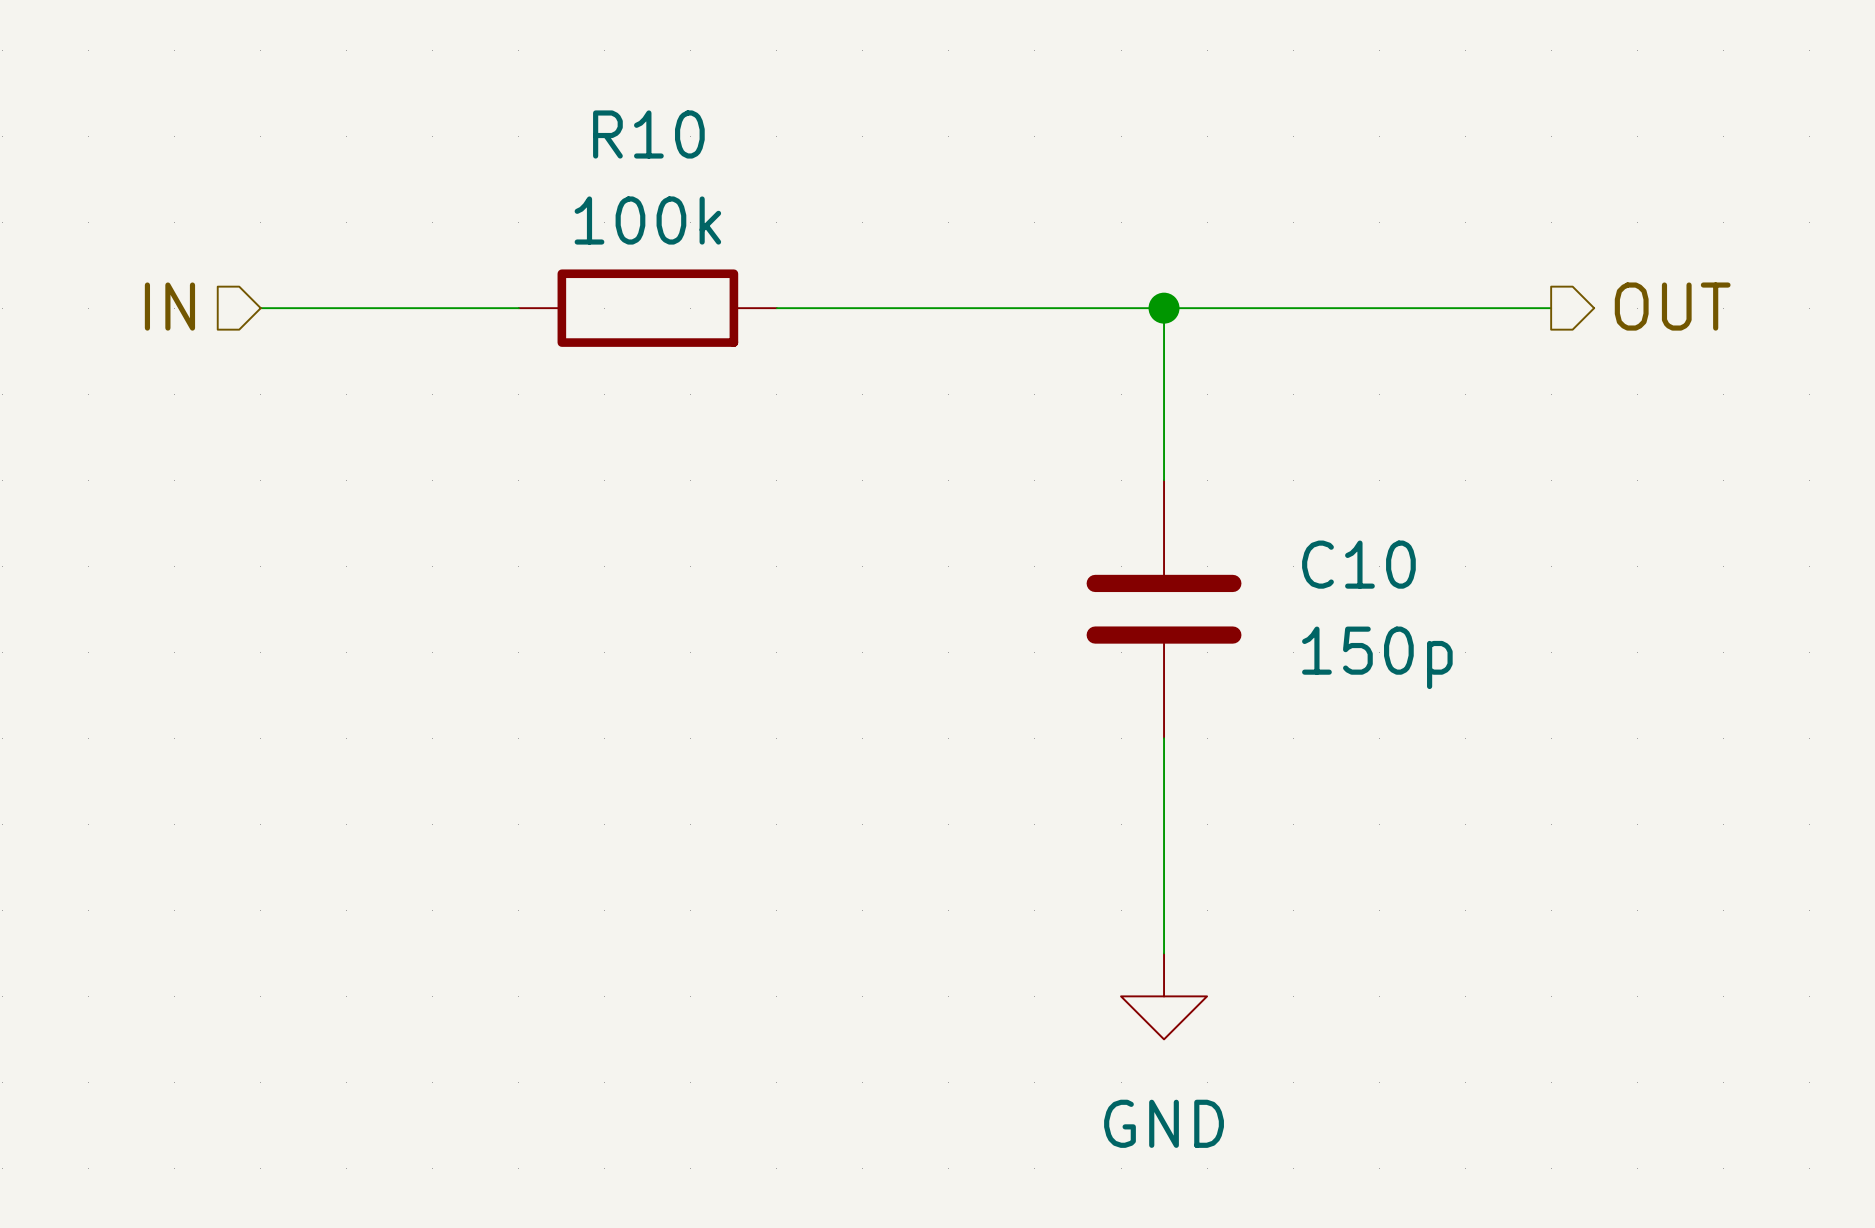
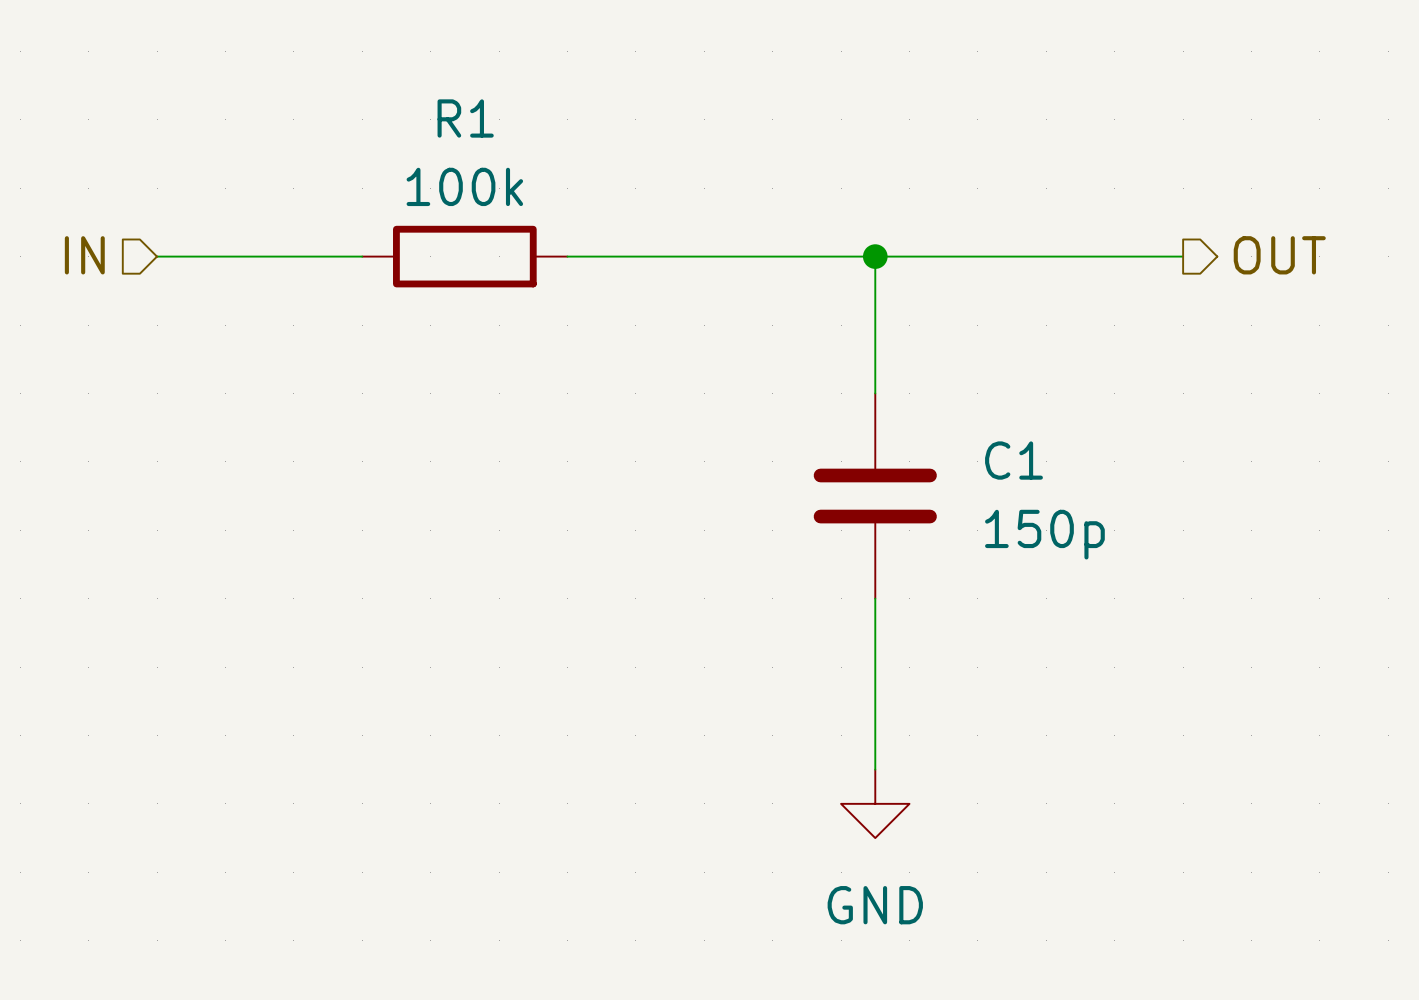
R10 name: R10 (648, 134) -> R1 (465, 118)
C10 name: C10 (1358, 564) -> C1 (1013, 460)

